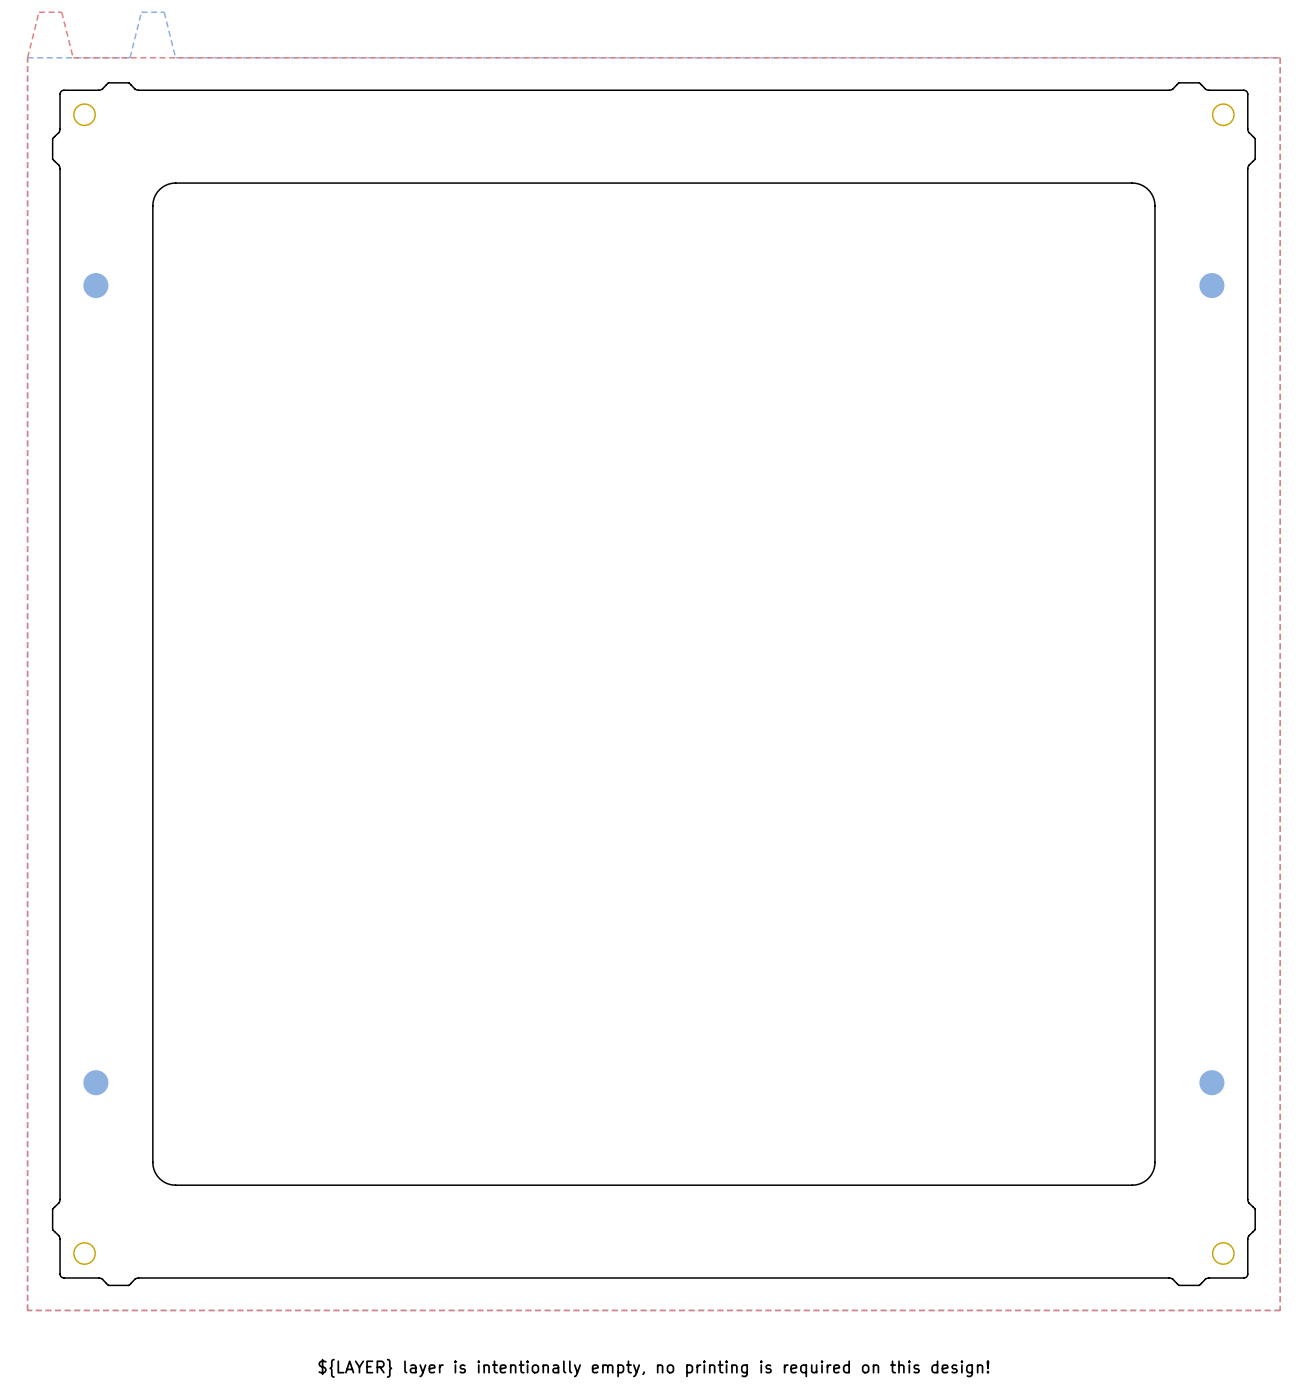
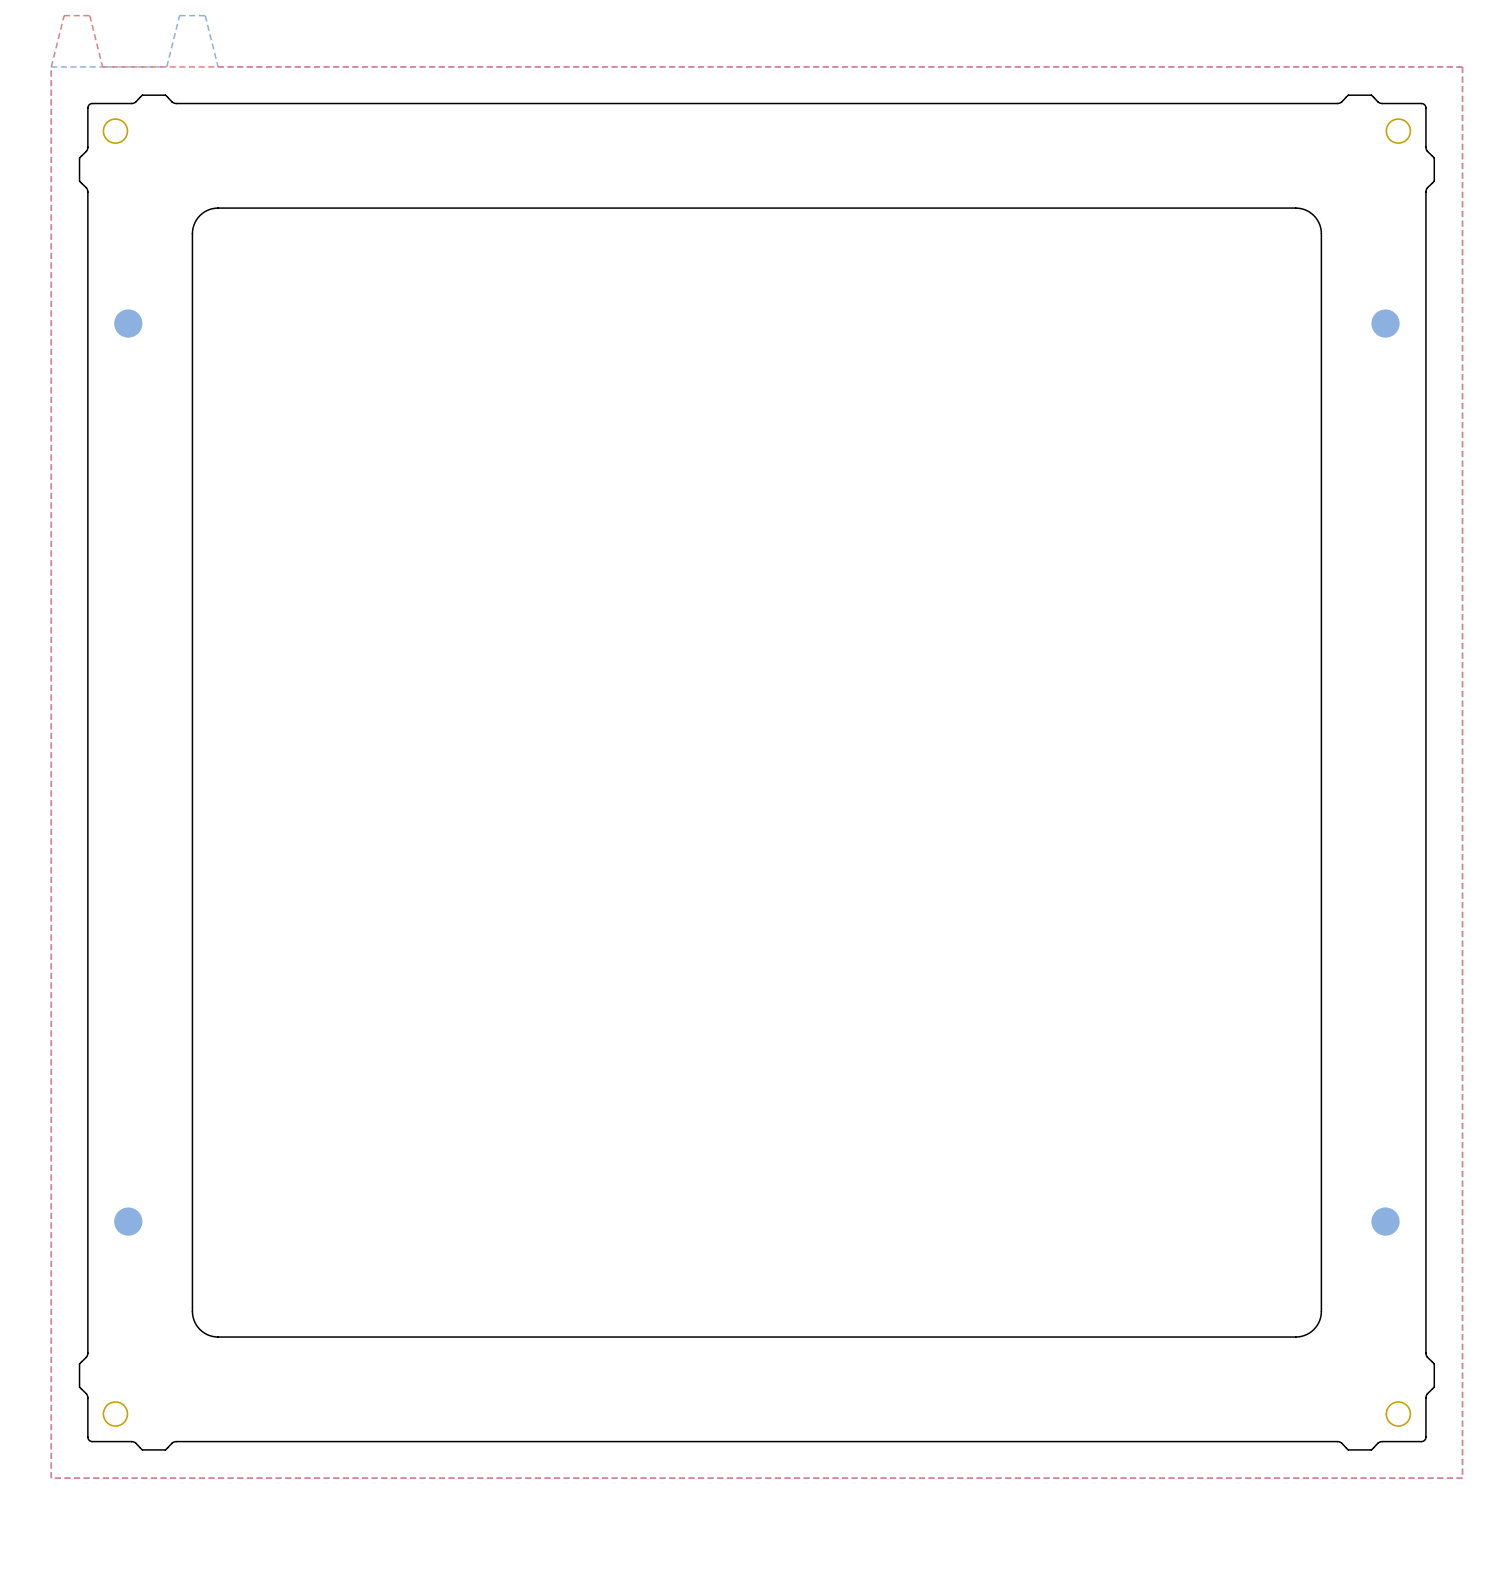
text: ${LAYER} layer is intentionally empty, no printing is required on this design! (653, 1368) -> none

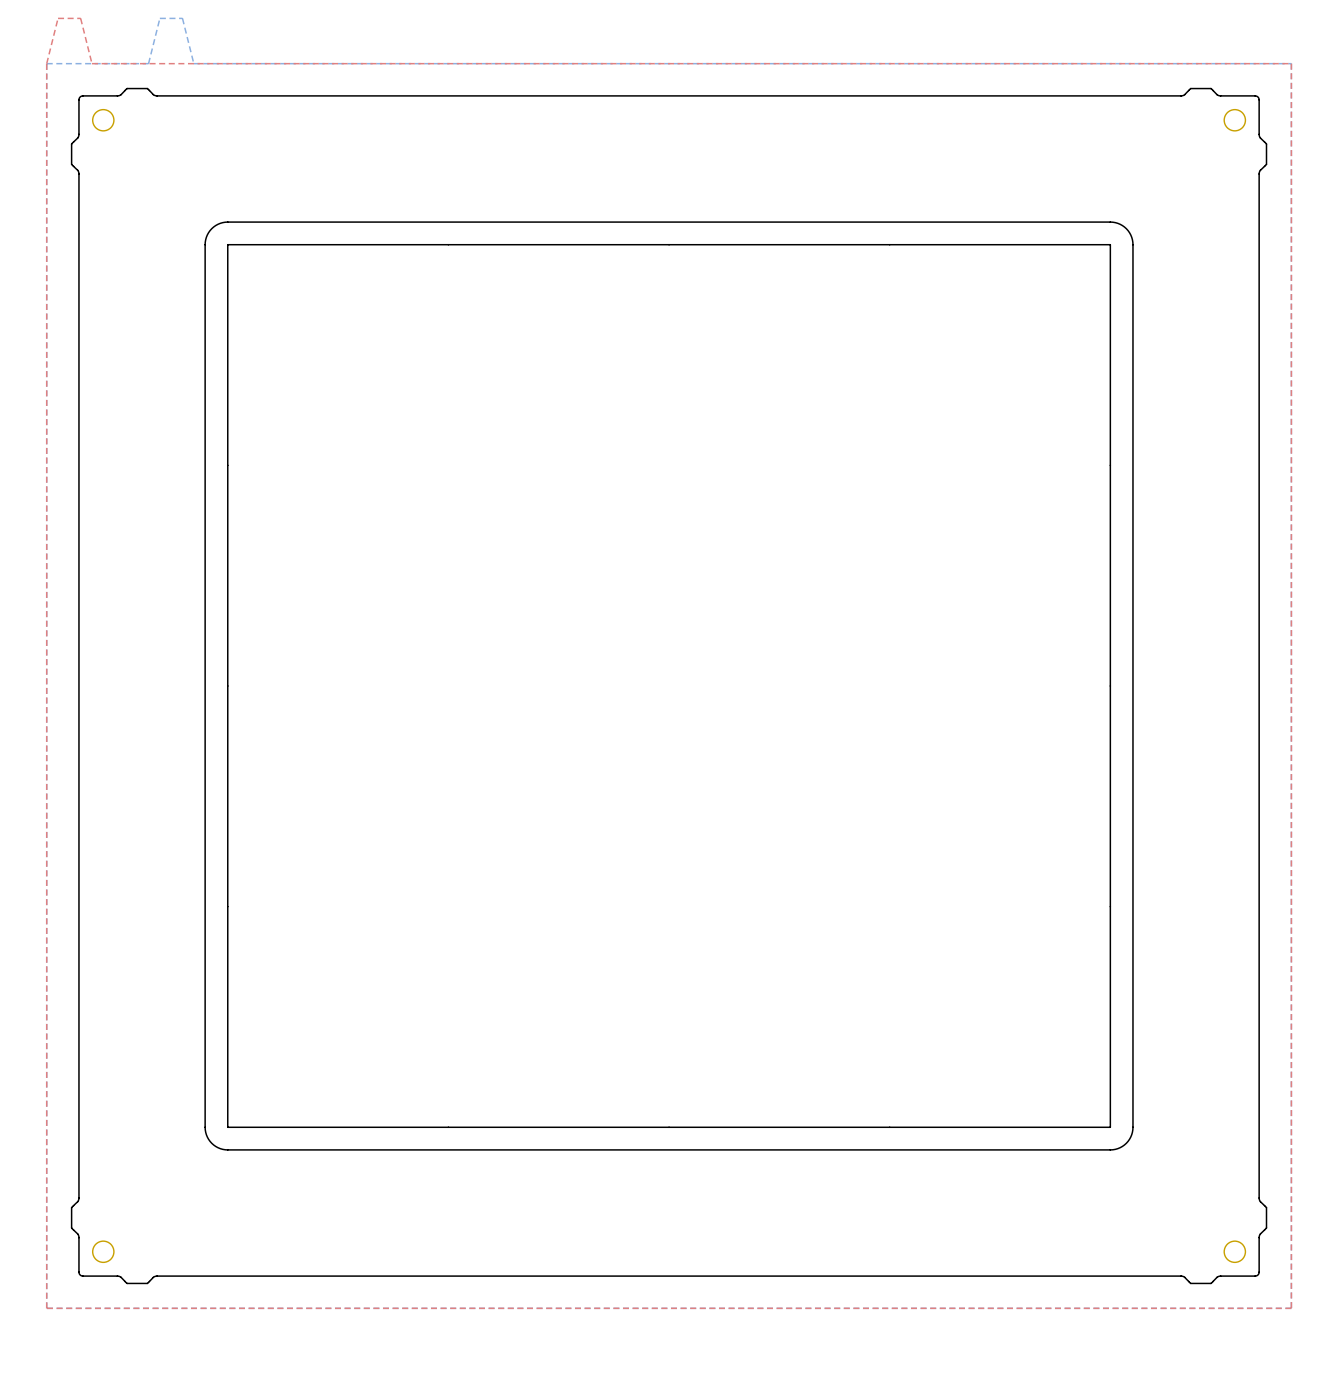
board edge: (218, 208) (1295, 208) (1306, 210) (1313, 215) (1319, 225) (1321, 233) (1321, 1311) (1319, 1319) (1313, 1329) (1304, 1335) (1295, 1337) (218, 1337) (209, 1335) (199, 1329) (193, 1319) (192, 1311) (192, 233) (193, 225) (199, 215) (206, 210) (218, 208) -> (227, 222) (217, 224) (211, 228) (206, 237) (205, 244) (205, 1127) (206, 1134) (211, 1143) (220, 1148) (227, 1149) (1110, 1149) (1117, 1148) (1126, 1143) (1131, 1134) (1132, 1127) (1132, 244) (1130, 234) (1126, 228) (1117, 223) (1110, 222) (227, 222)
line: none -> (227, 244) (1110, 244) (1110, 1127) (227, 1127) (227, 244)
drawing: [114, 309, 143, 338] -> none
drawing: [1371, 309, 1400, 338] -> none
drawing: [114, 1207, 143, 1236] -> none
drawing: [1371, 1207, 1400, 1236] -> none

